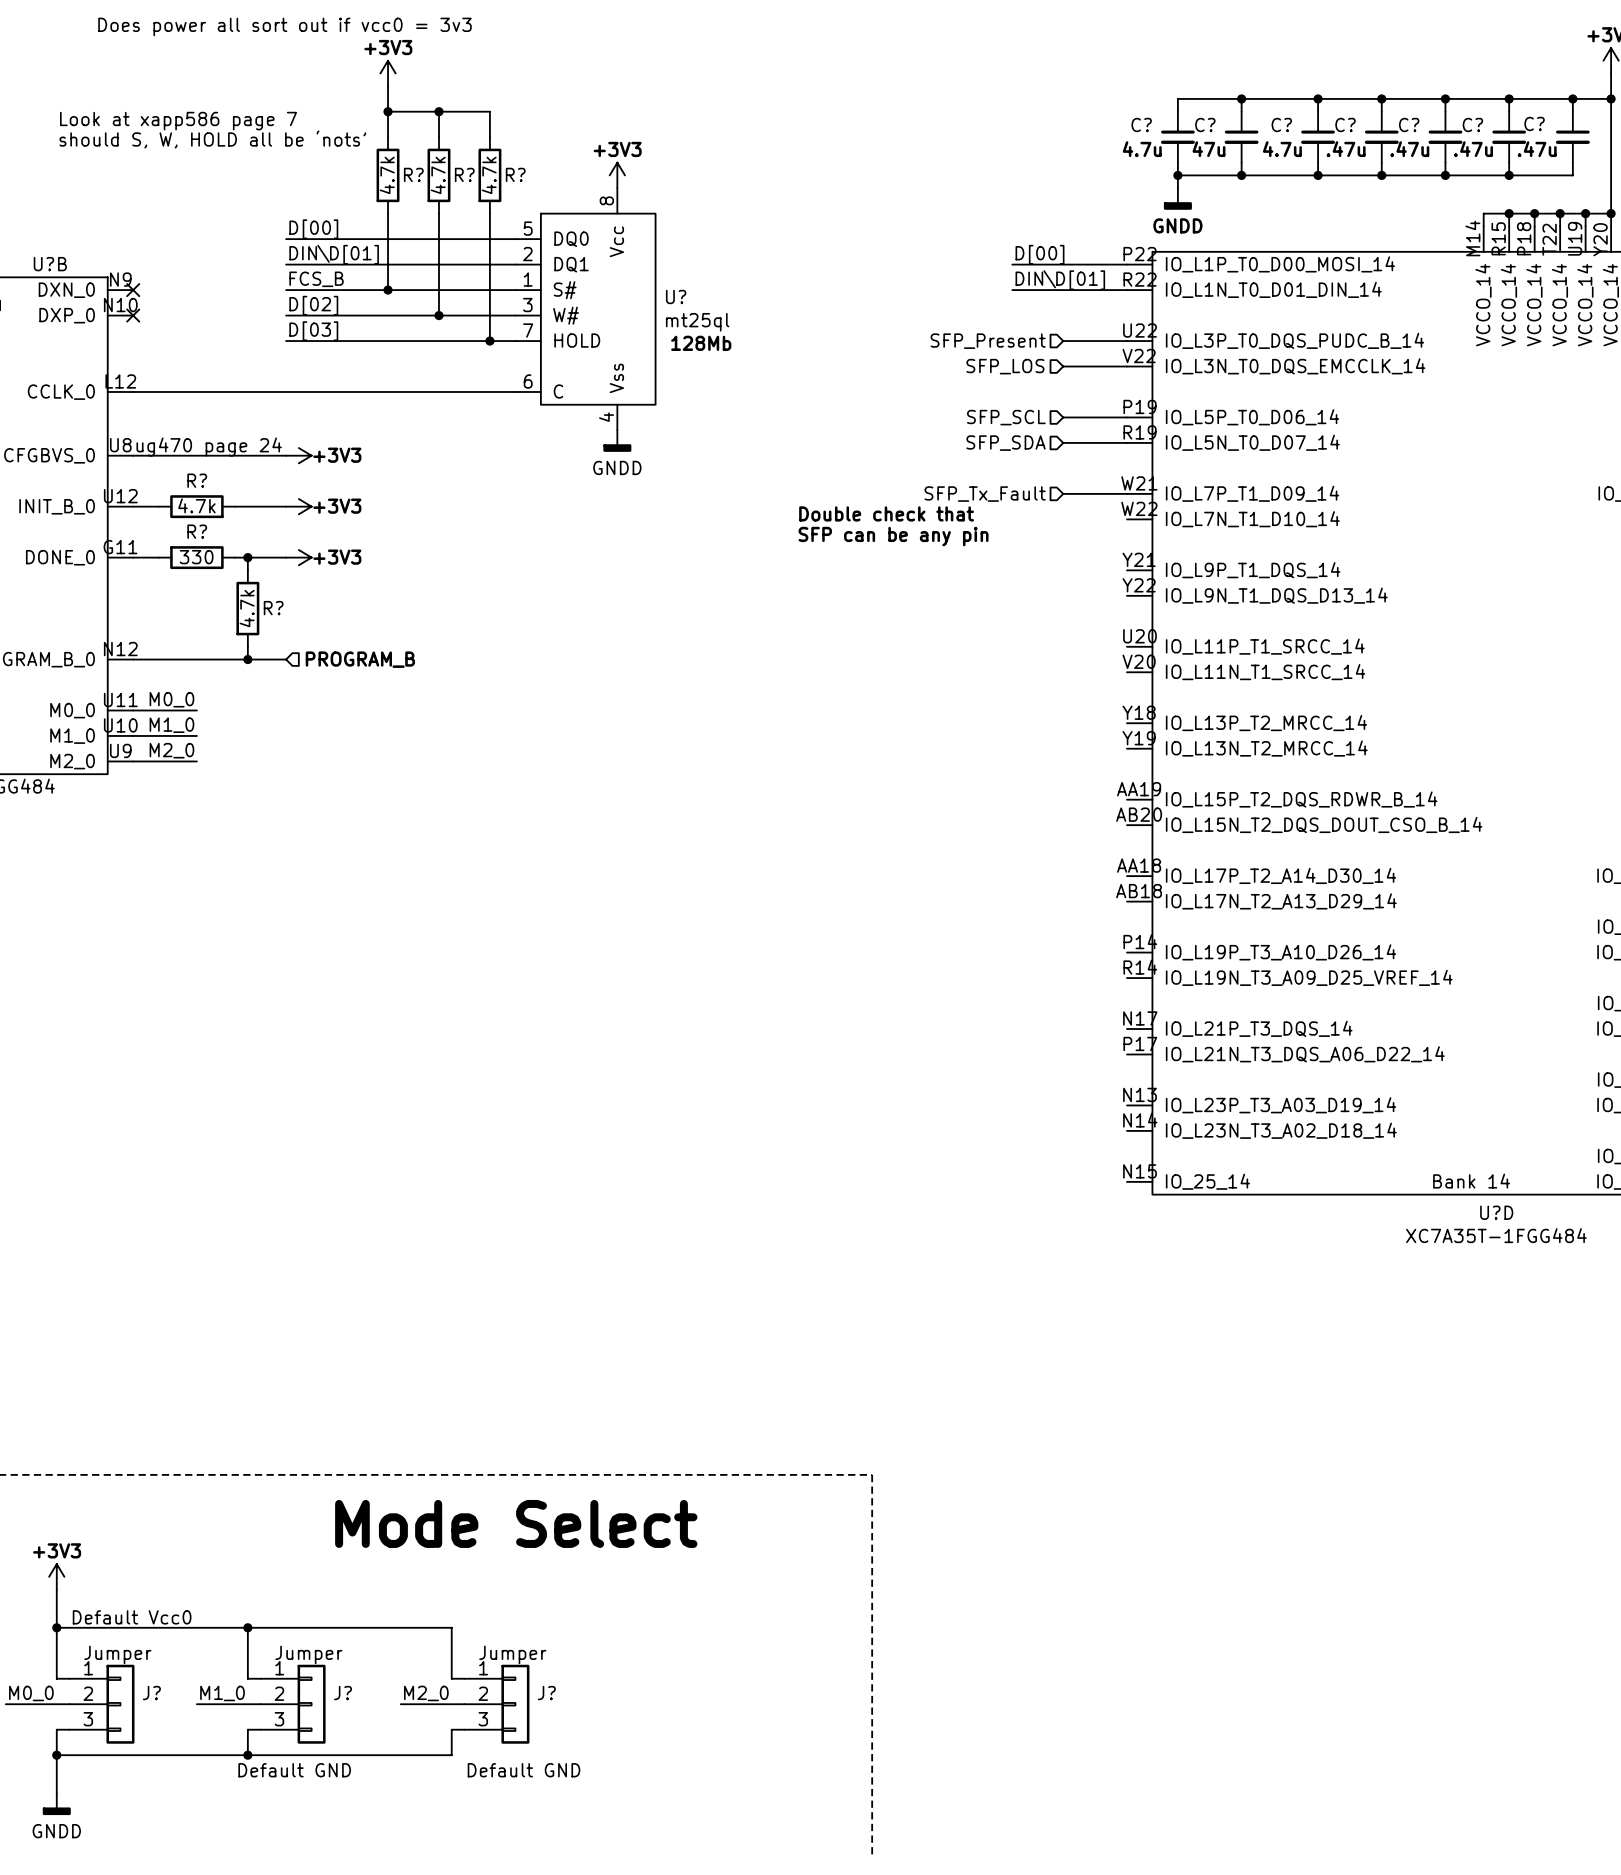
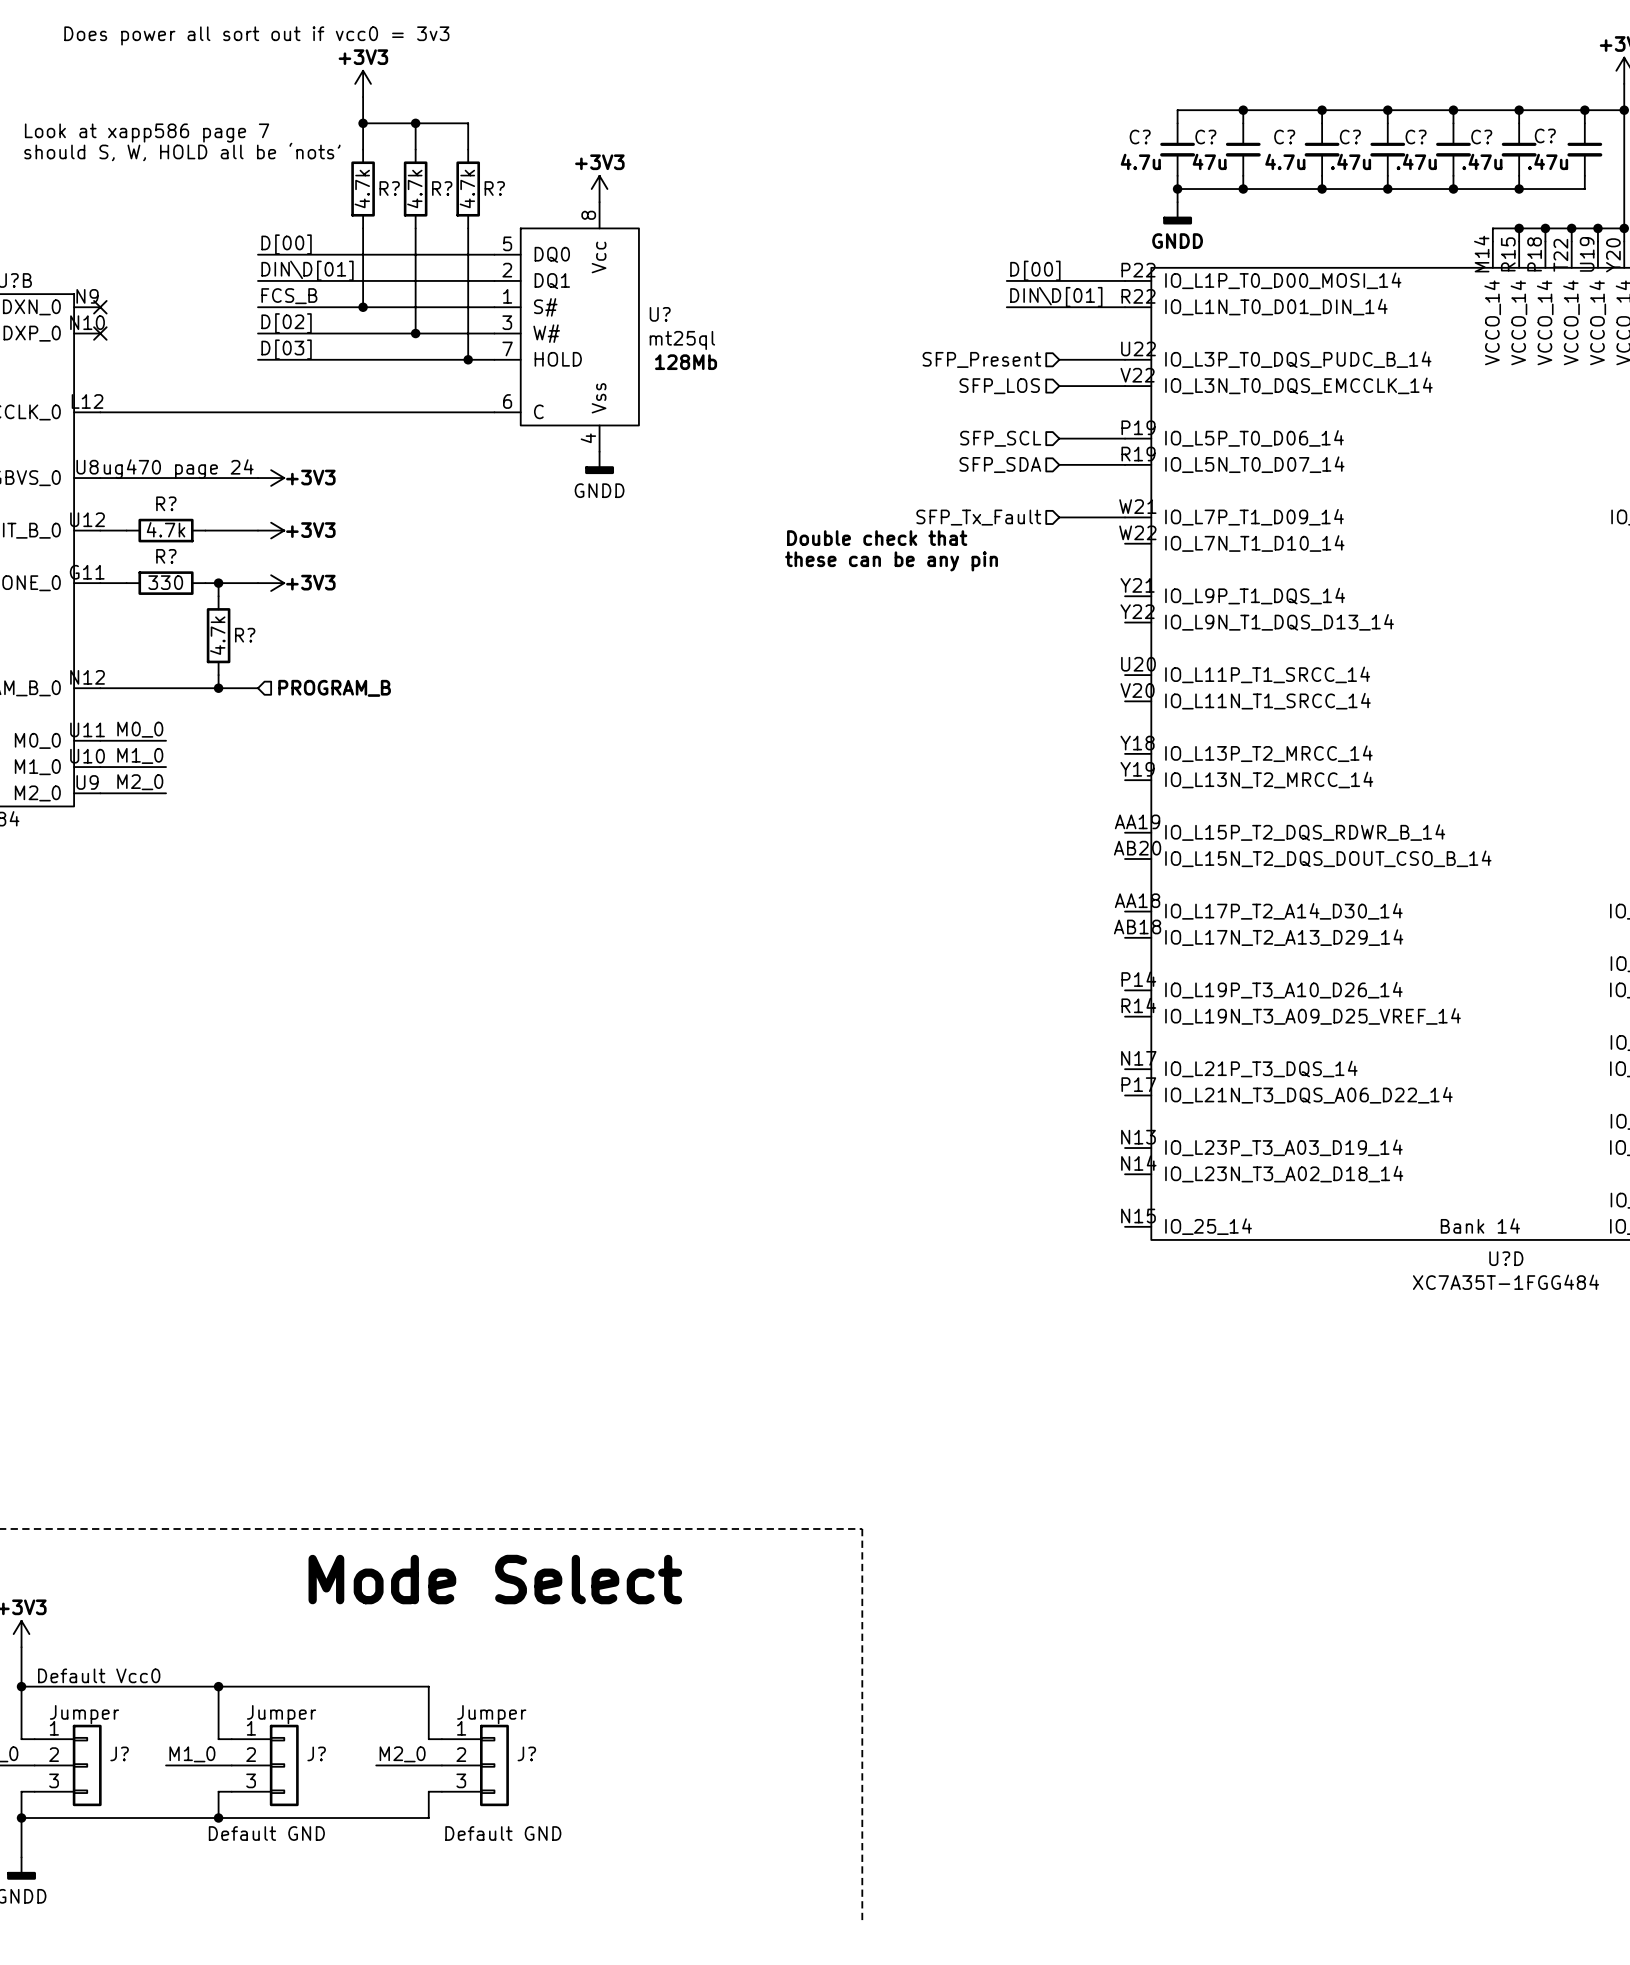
text: SFP can be any pin (893, 536) -> these can be any pin (891, 561)

